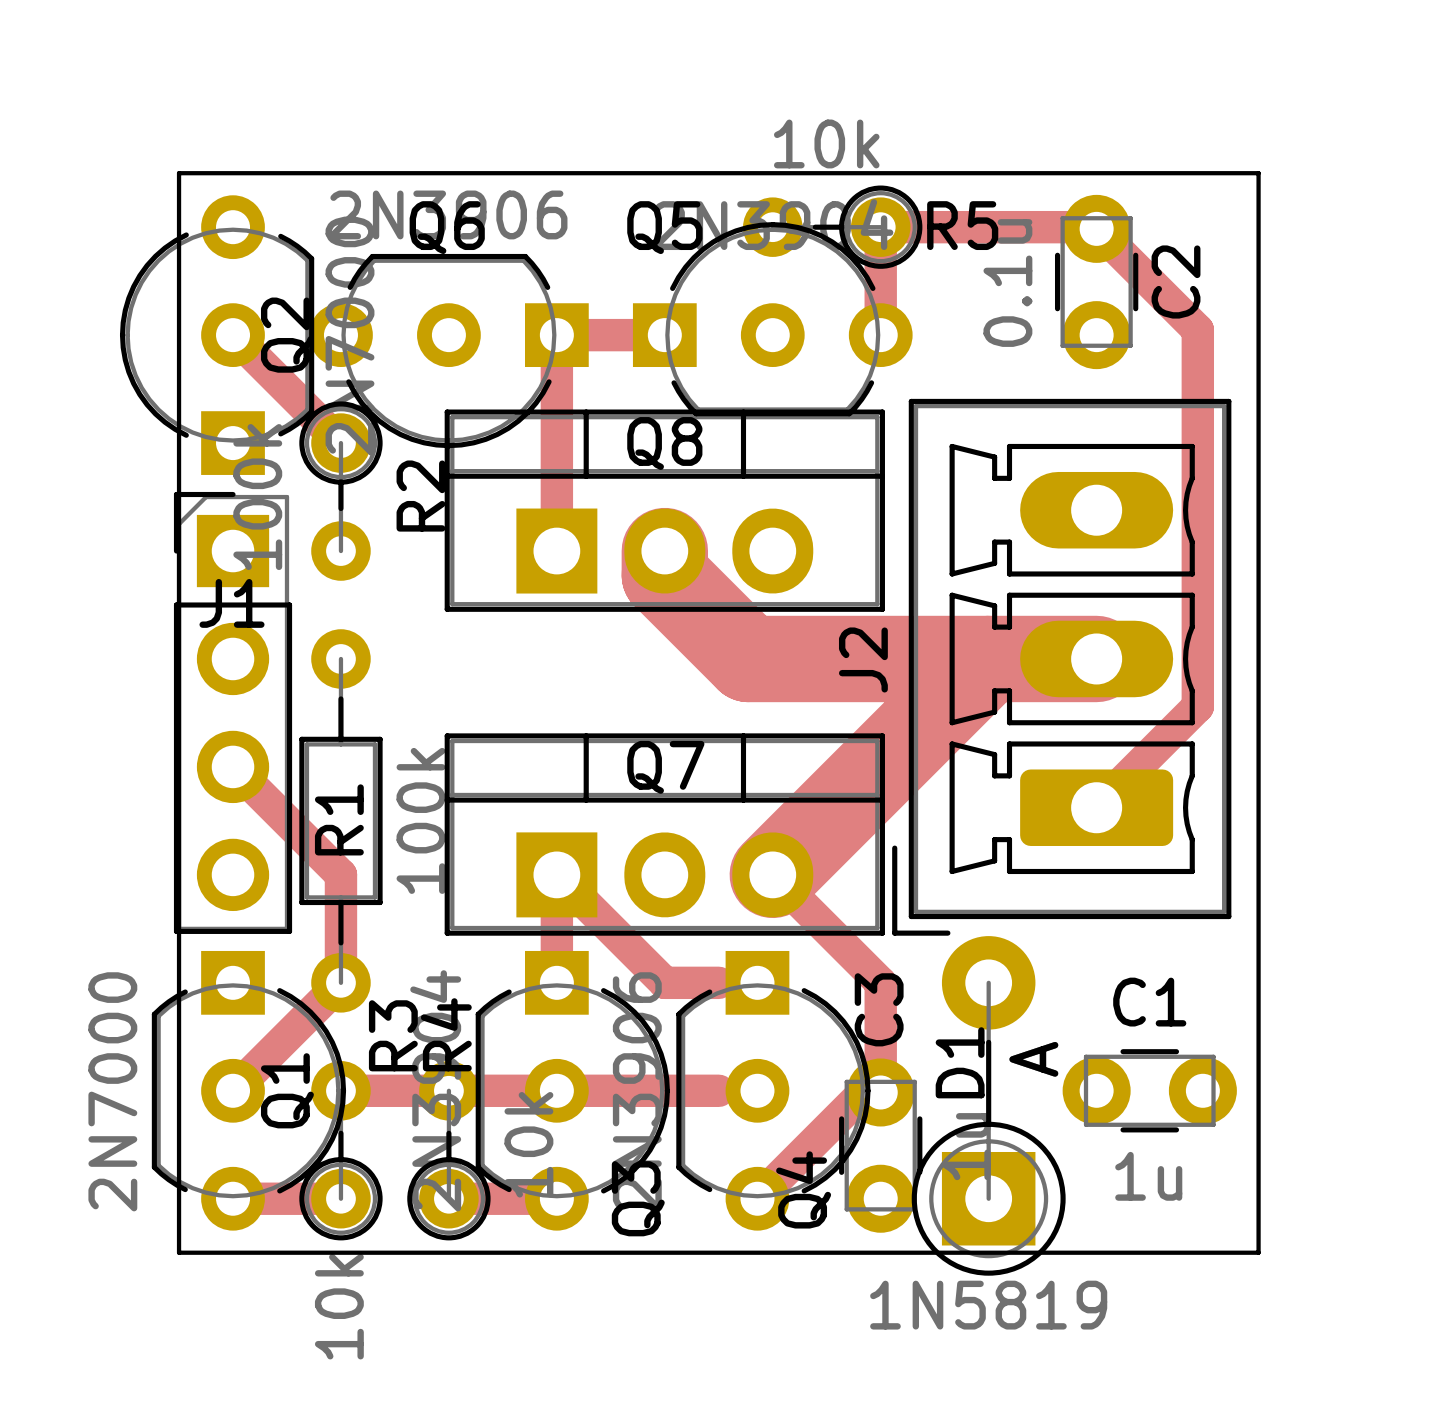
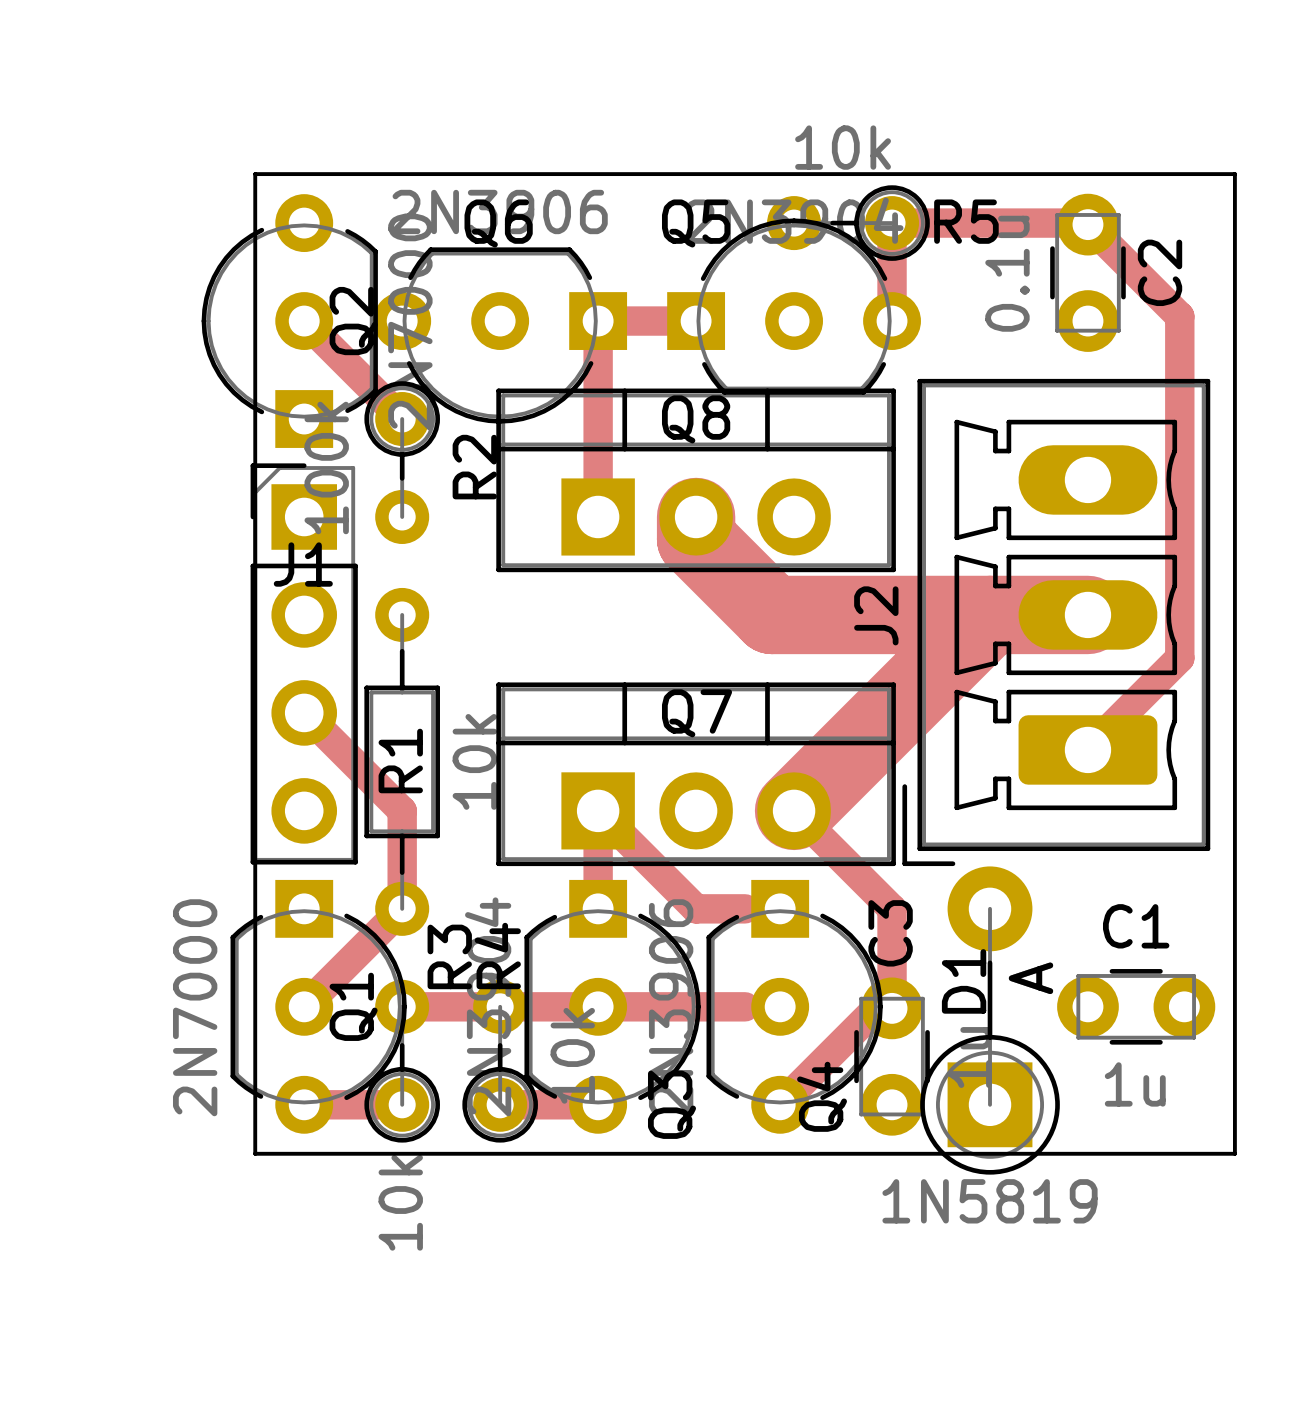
R1 value: 100k (420, 820) -> 10k (474, 761)

